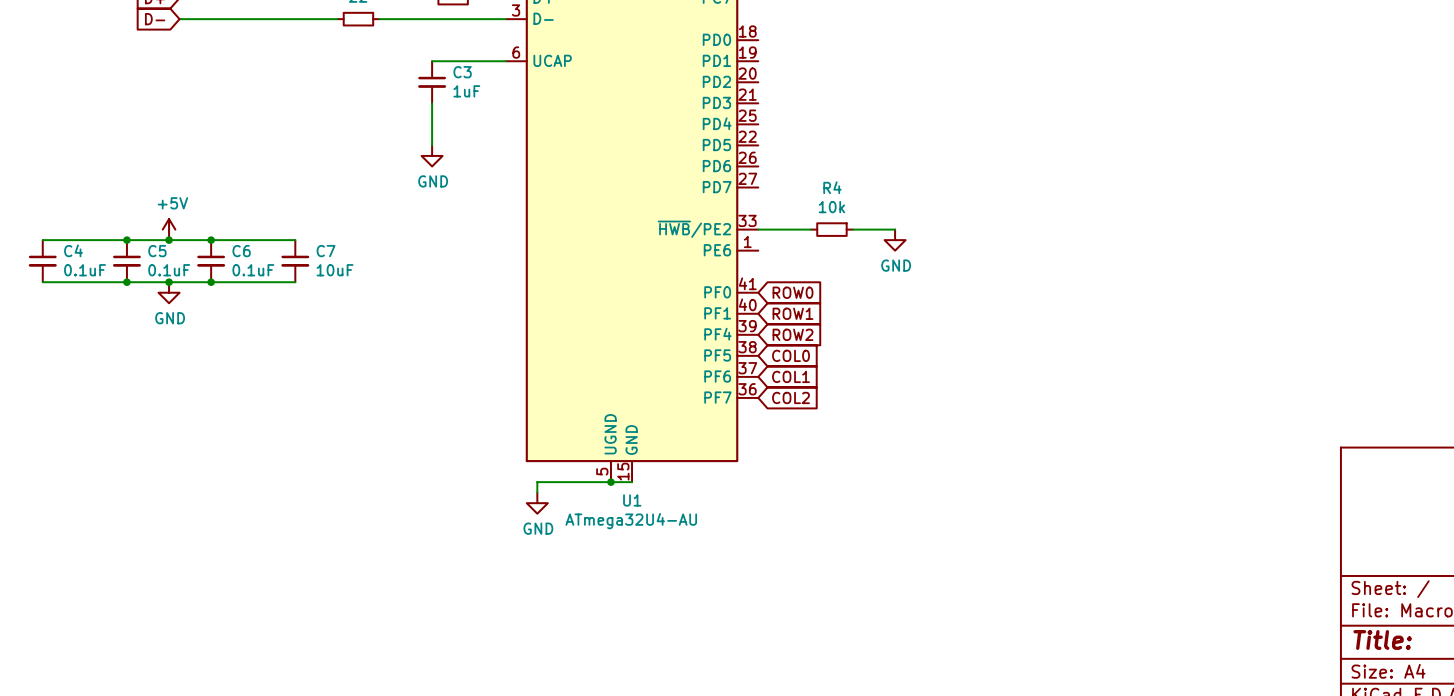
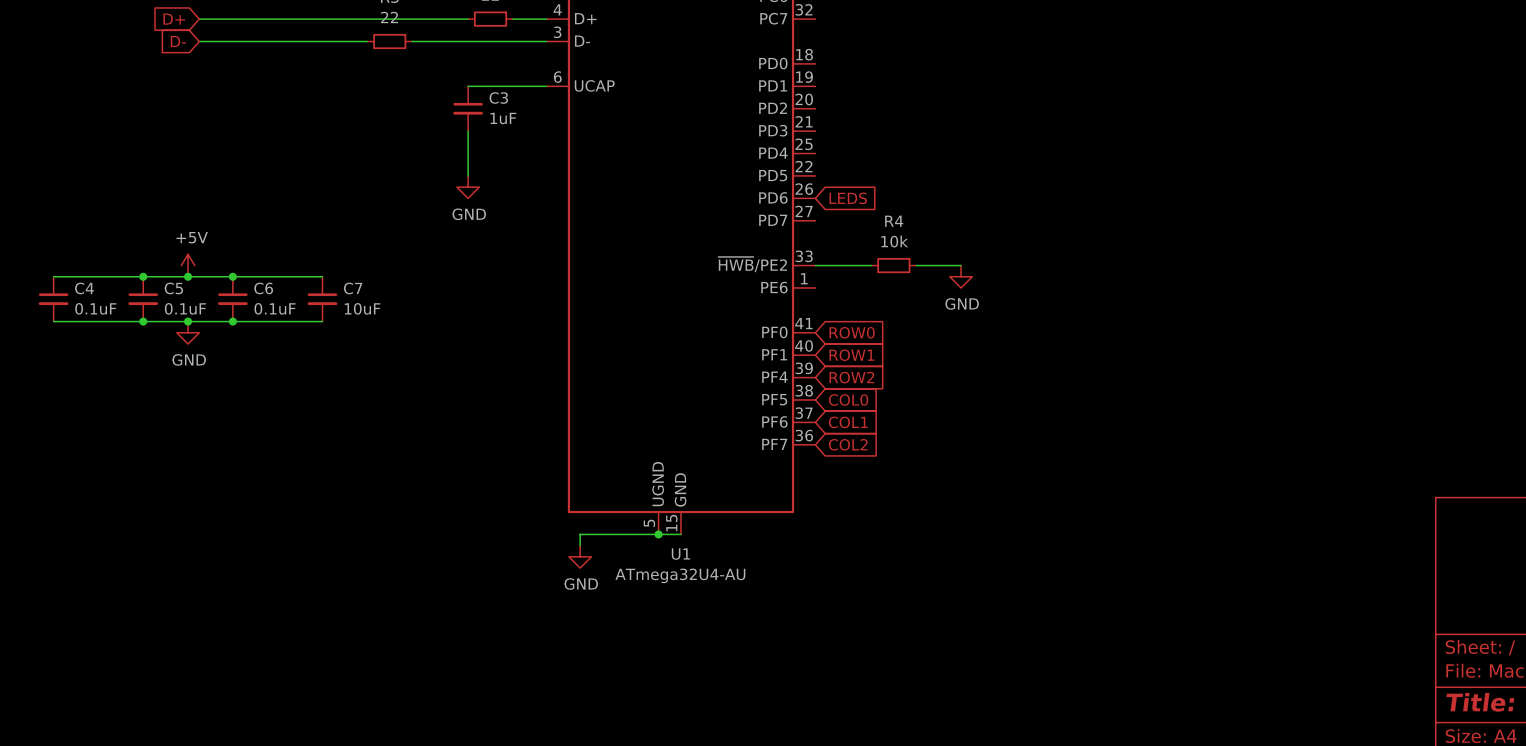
global label: none -> LEDS (848, 198)

